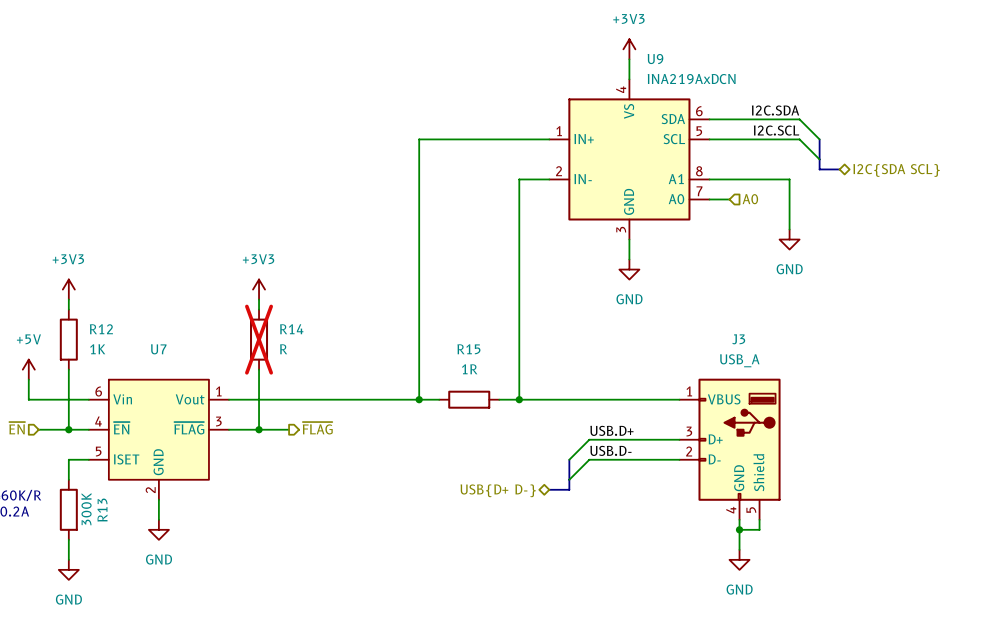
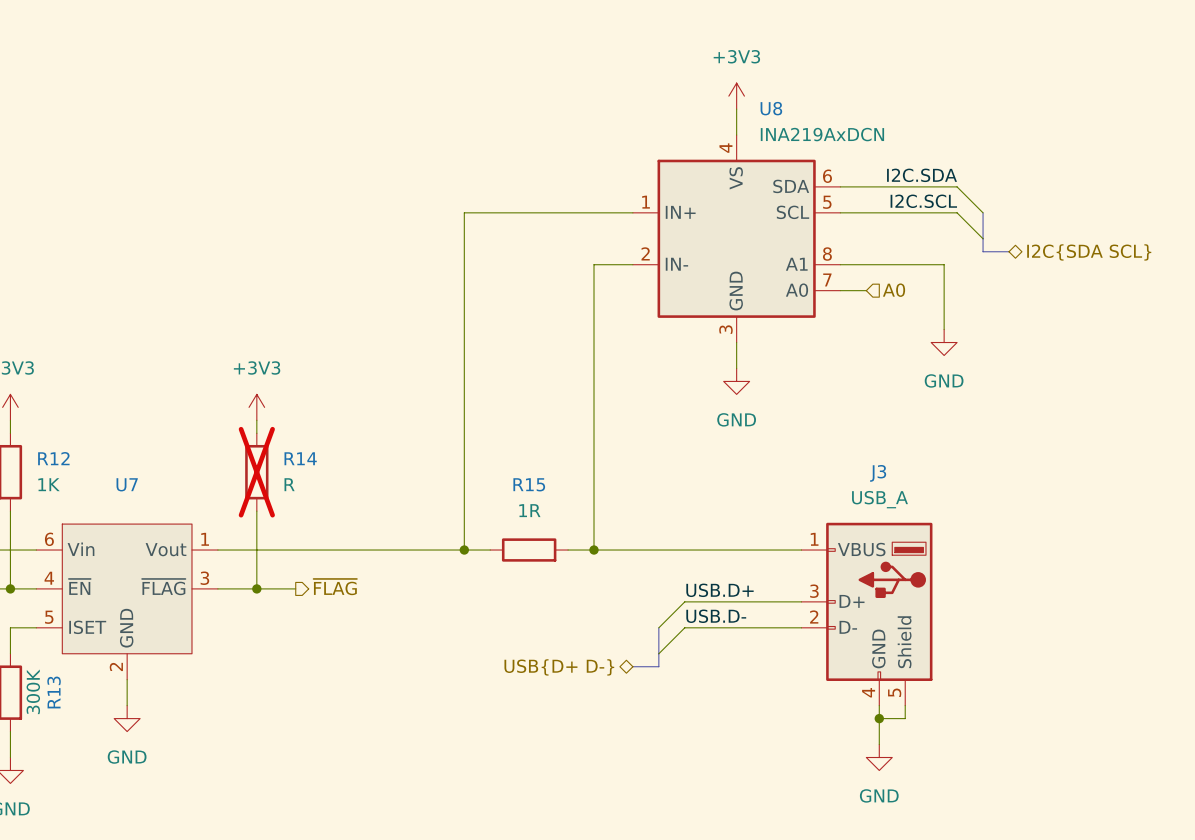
U9 name: U9 (655, 59) -> U8 (771, 108)

